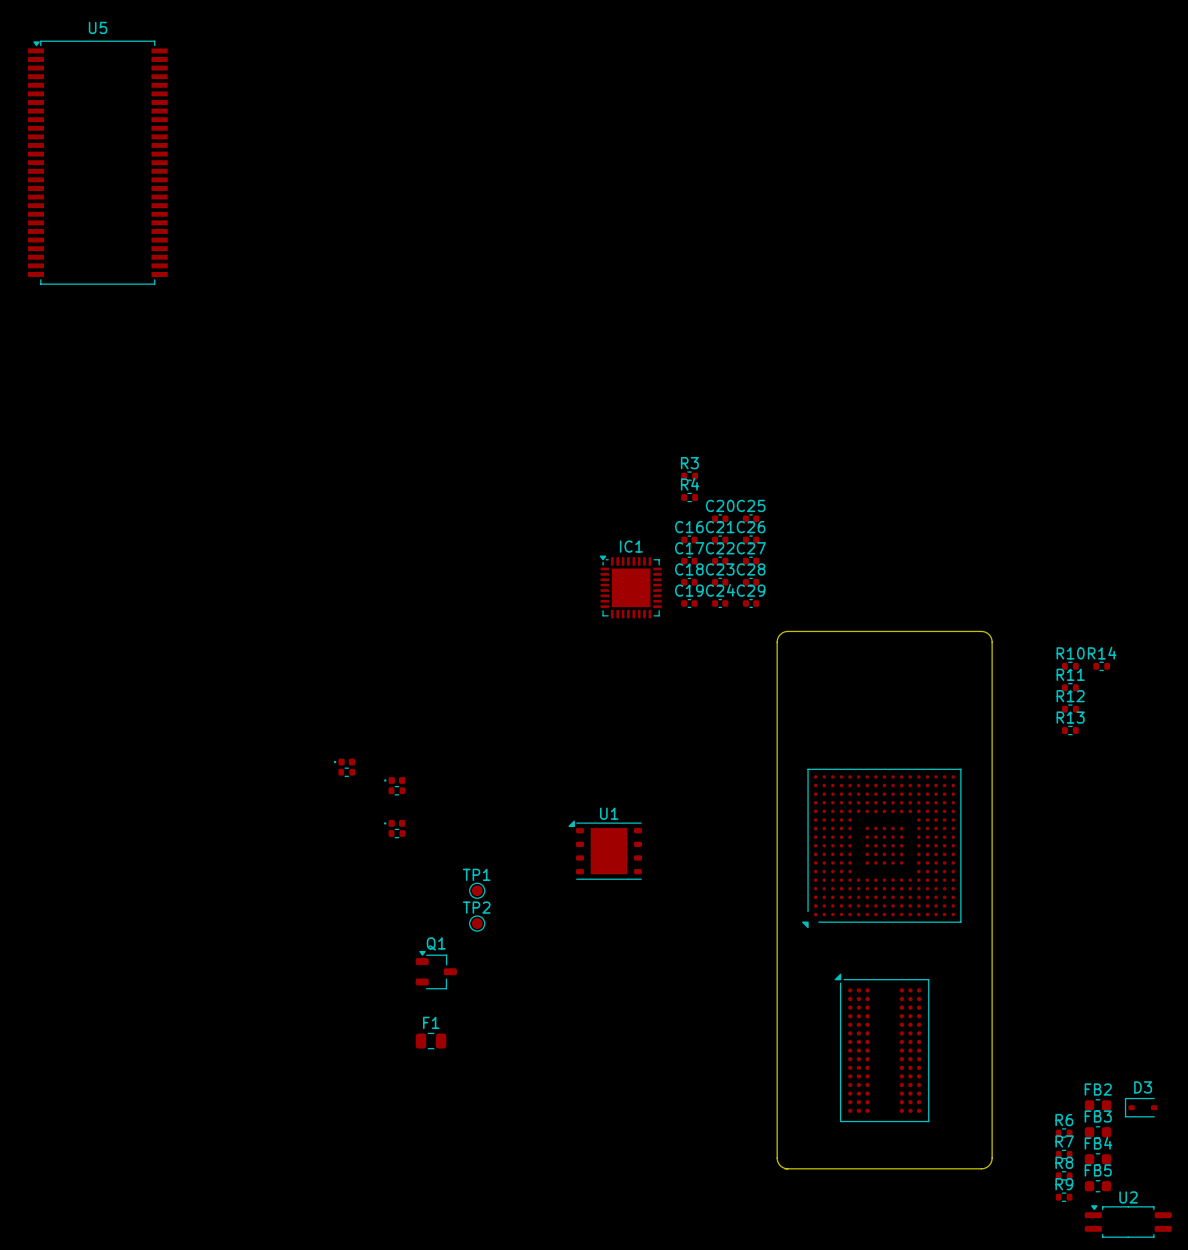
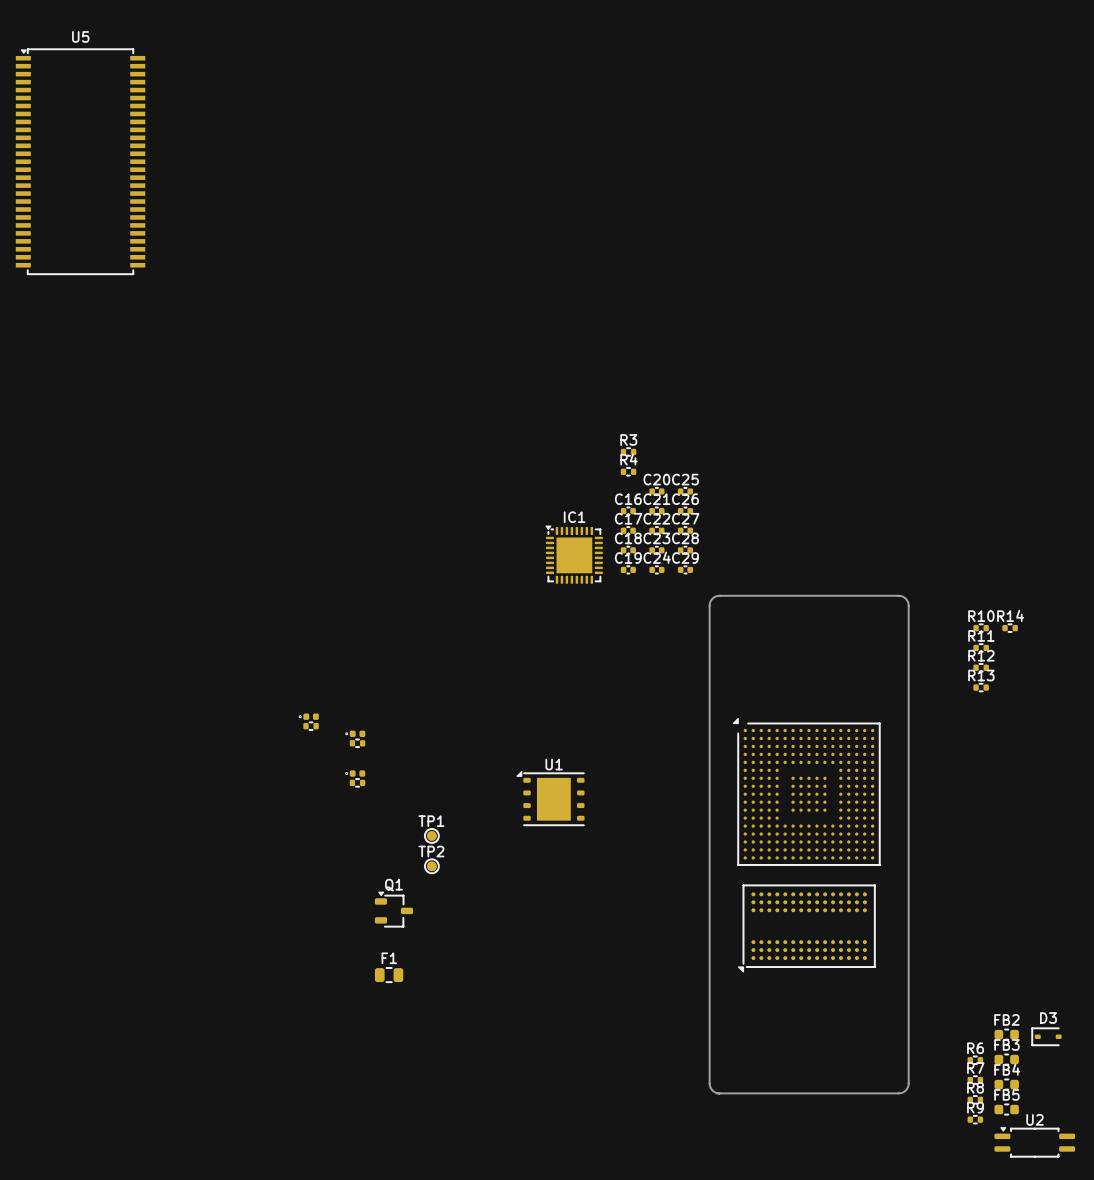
part rotation: 0° (881, 848) -> 90° clockwise (806, 791)
part rotation: 0° (881, 1047) -> 90° counterclockwise (806, 928)

